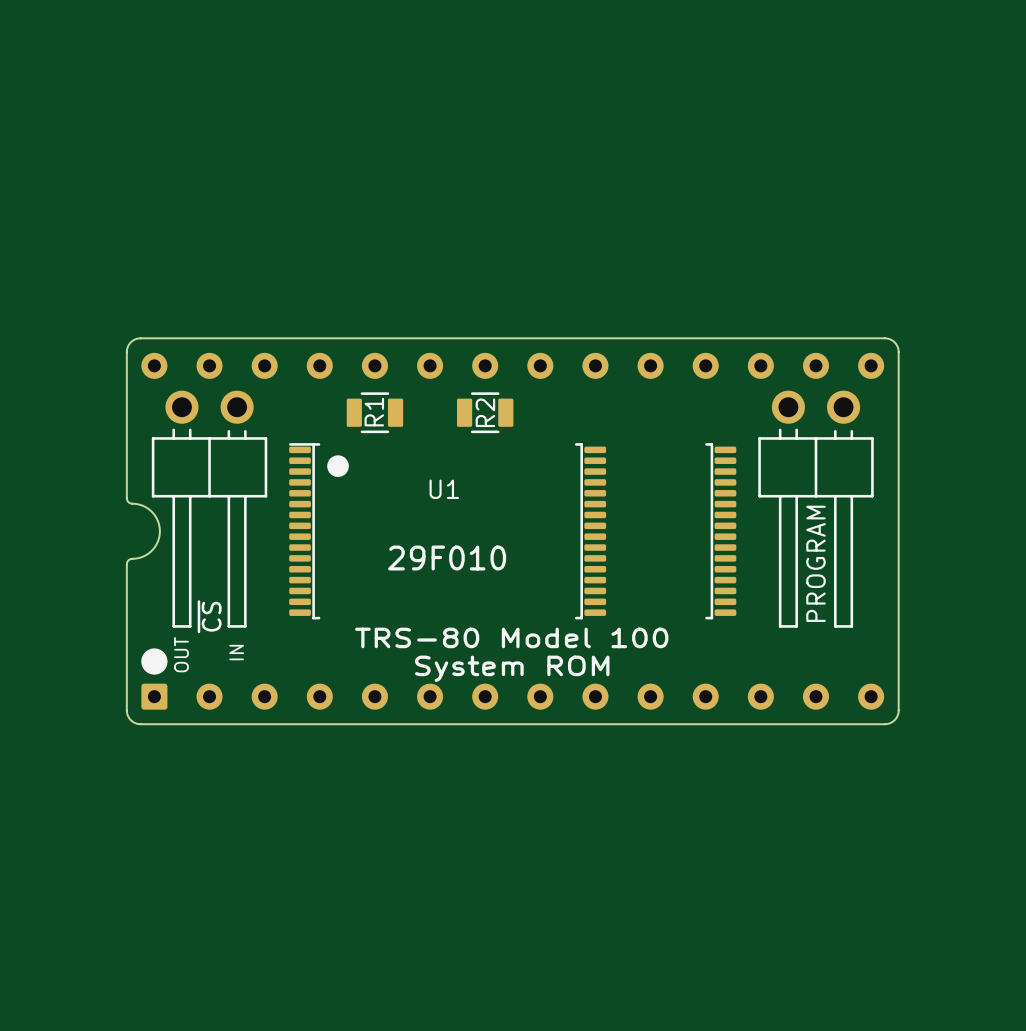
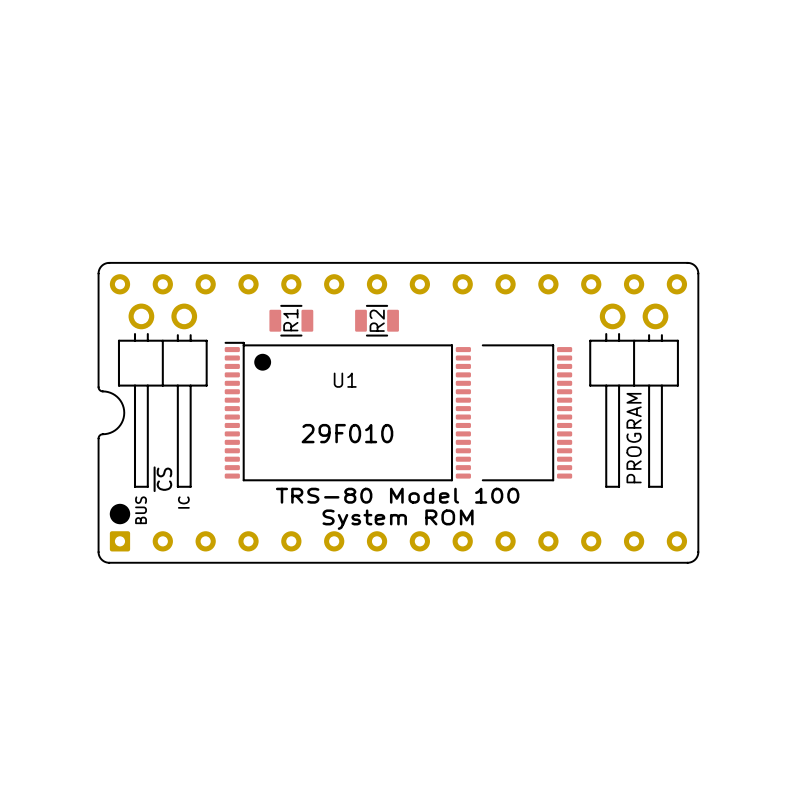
U1 footprint: [288, 443, 737, 620] -> [224, 341, 573, 482]
text: IN (236, 652) -> IC (183, 502)
text: OUT (181, 654) -> BUS (141, 510)

